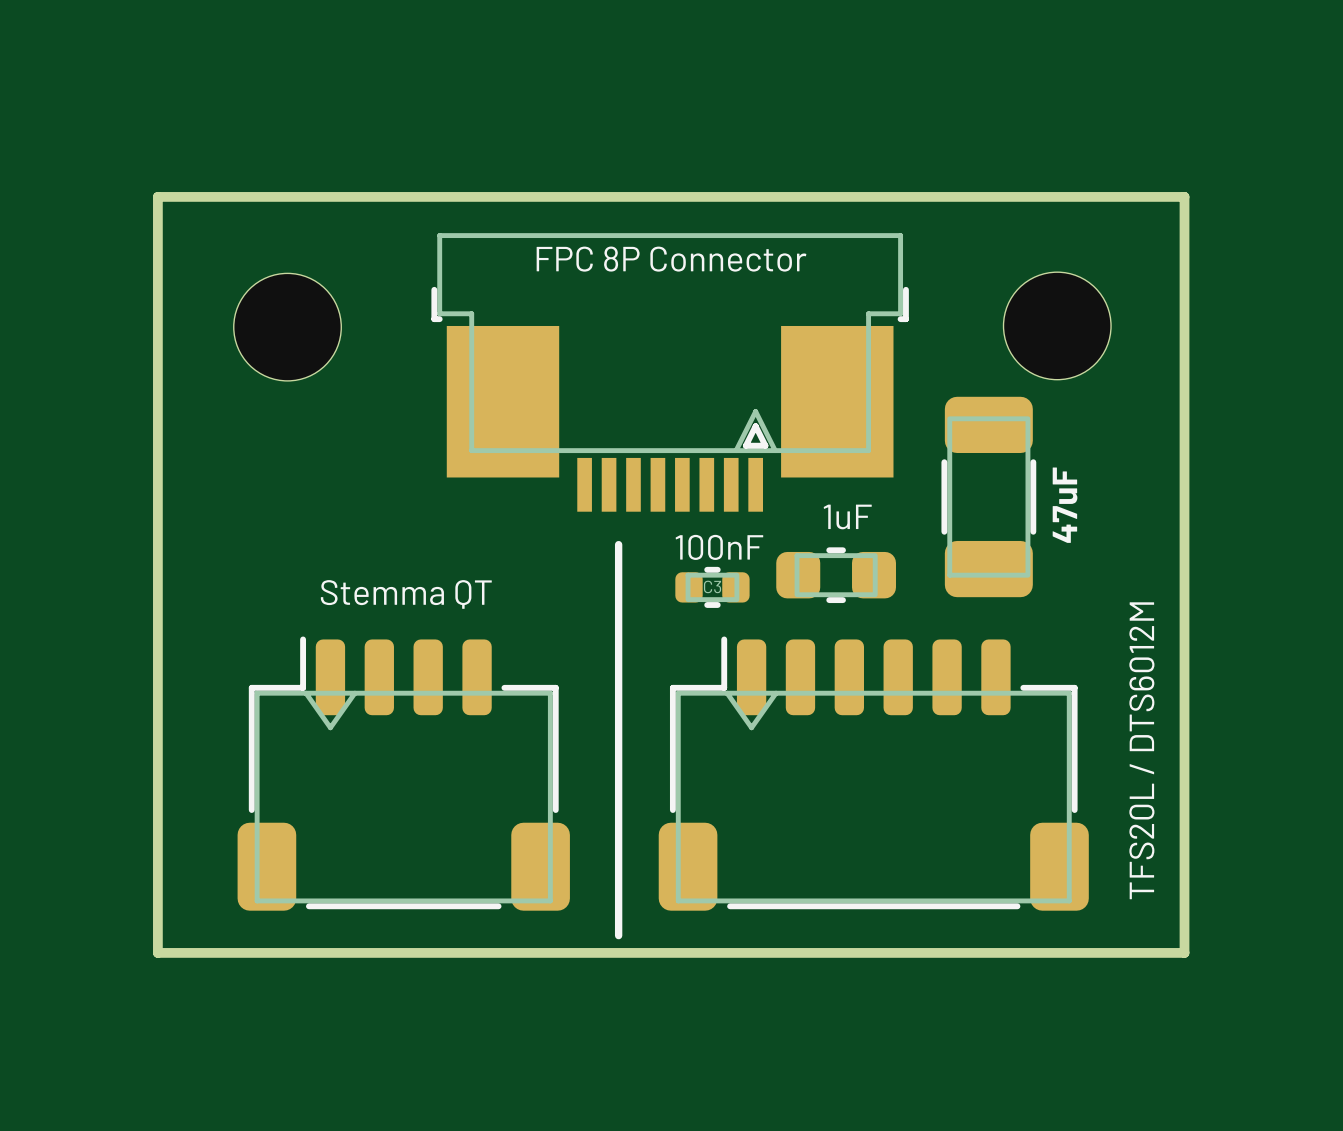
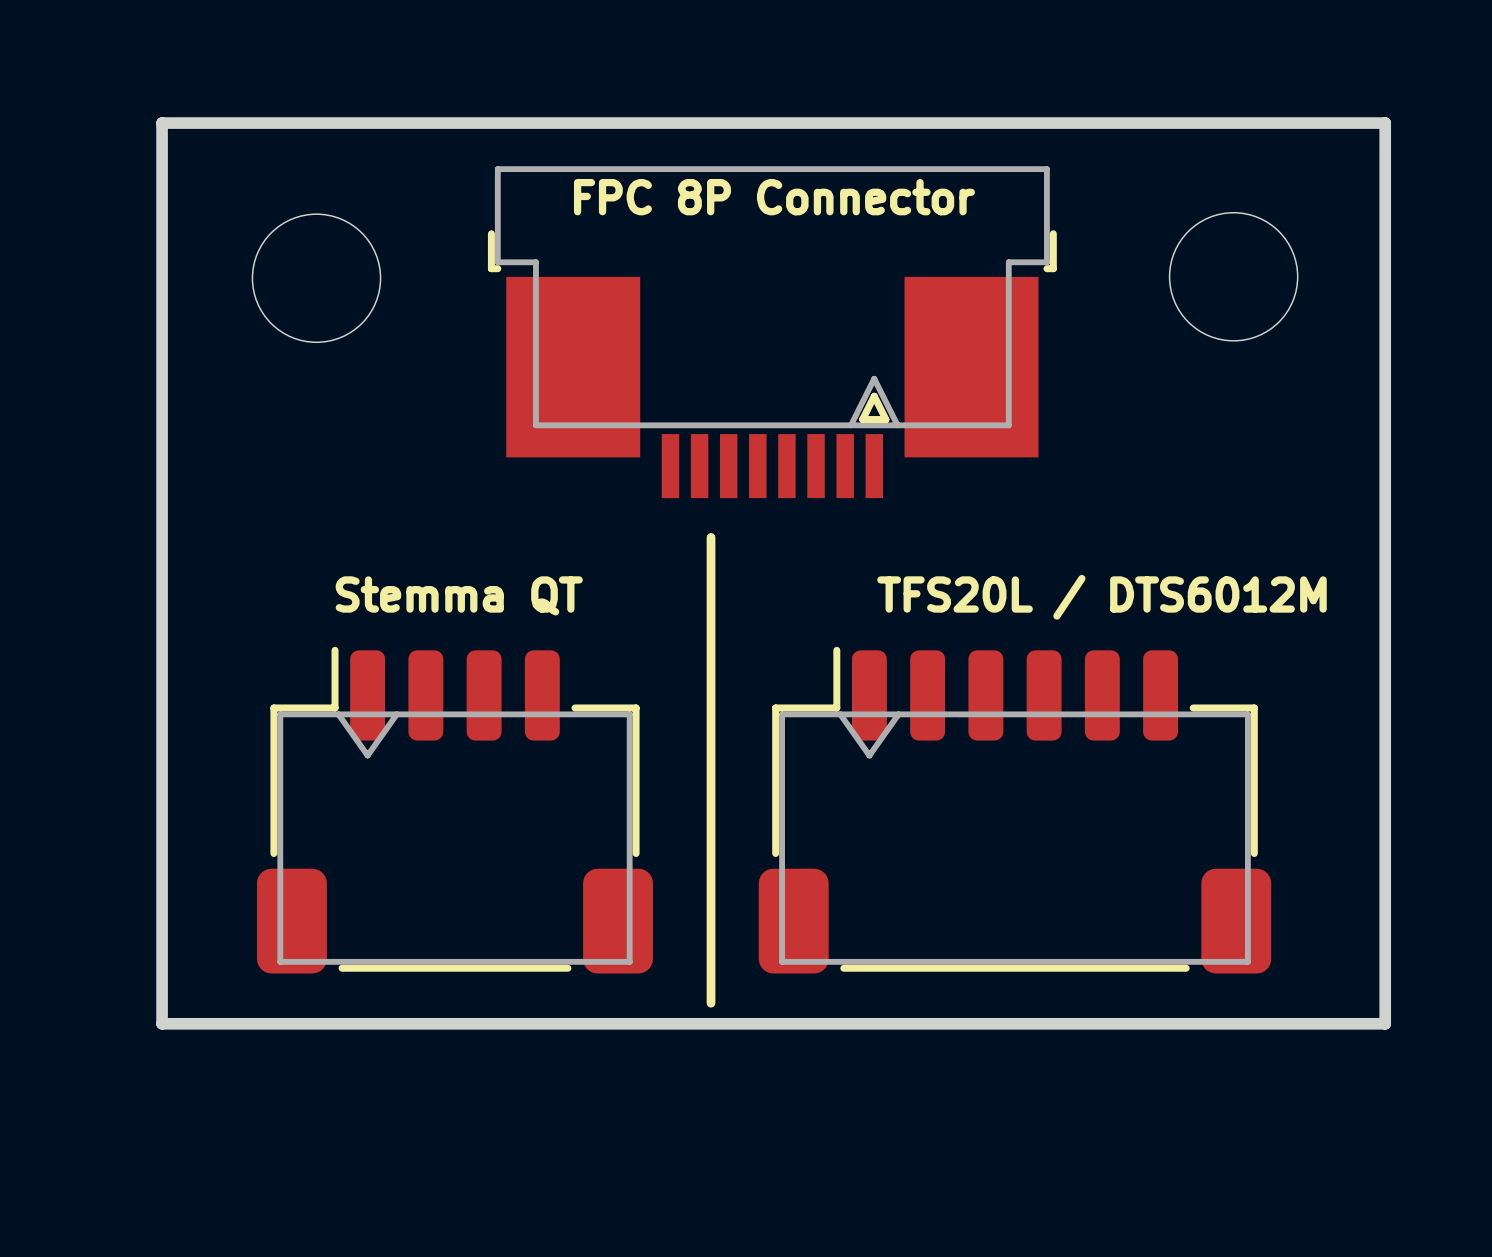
part: 47uF (988, 496) -> none
part: 1uF (836, 575) -> none
C3: 100nF (712, 587) -> none
part value rotation: 0° (1141, 750) -> 90° clockwise (1101, 597)

